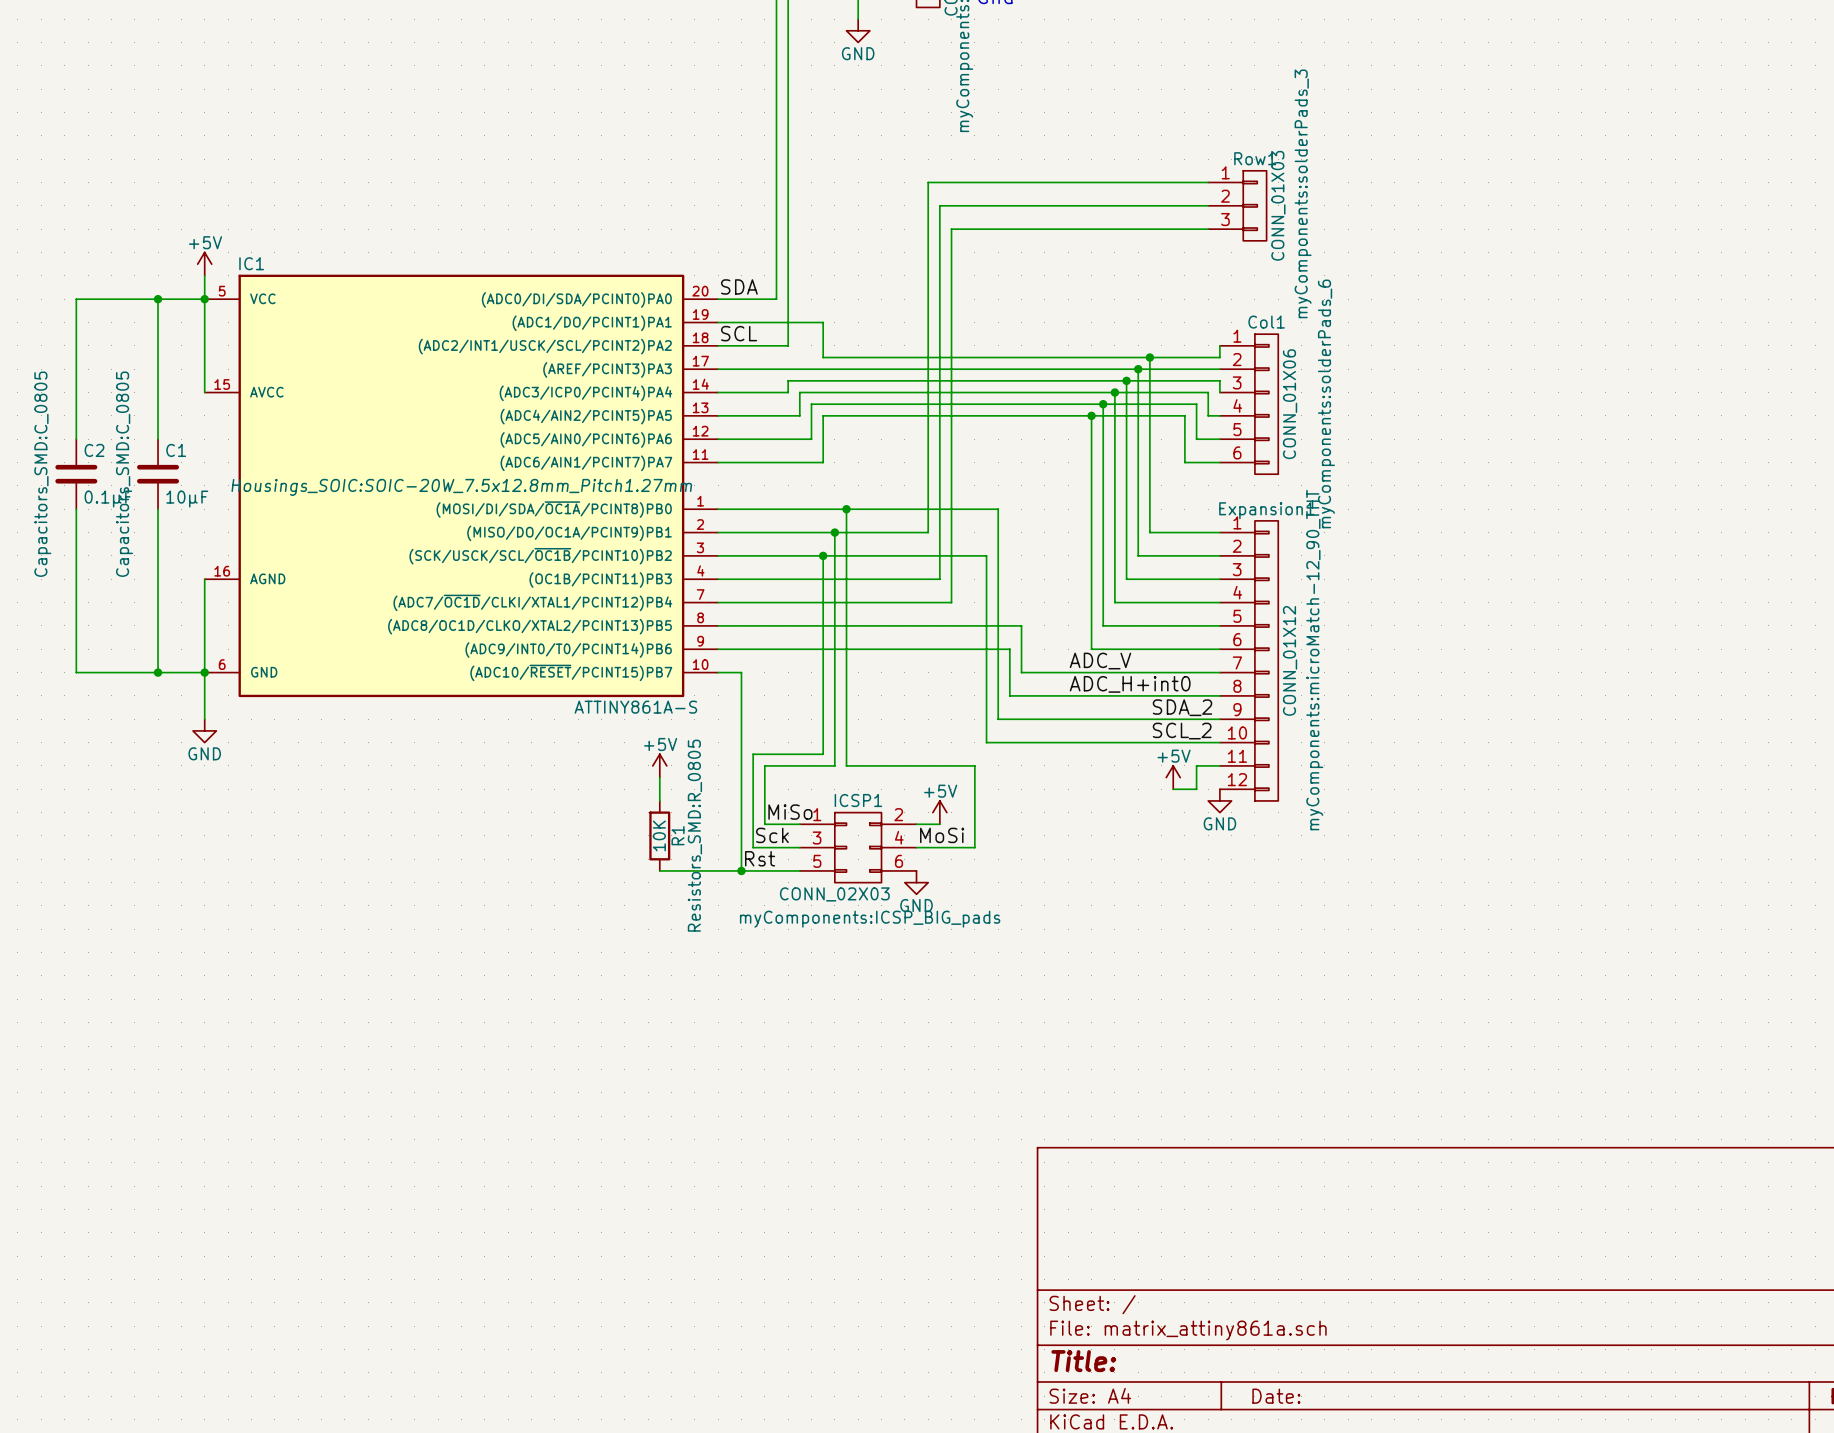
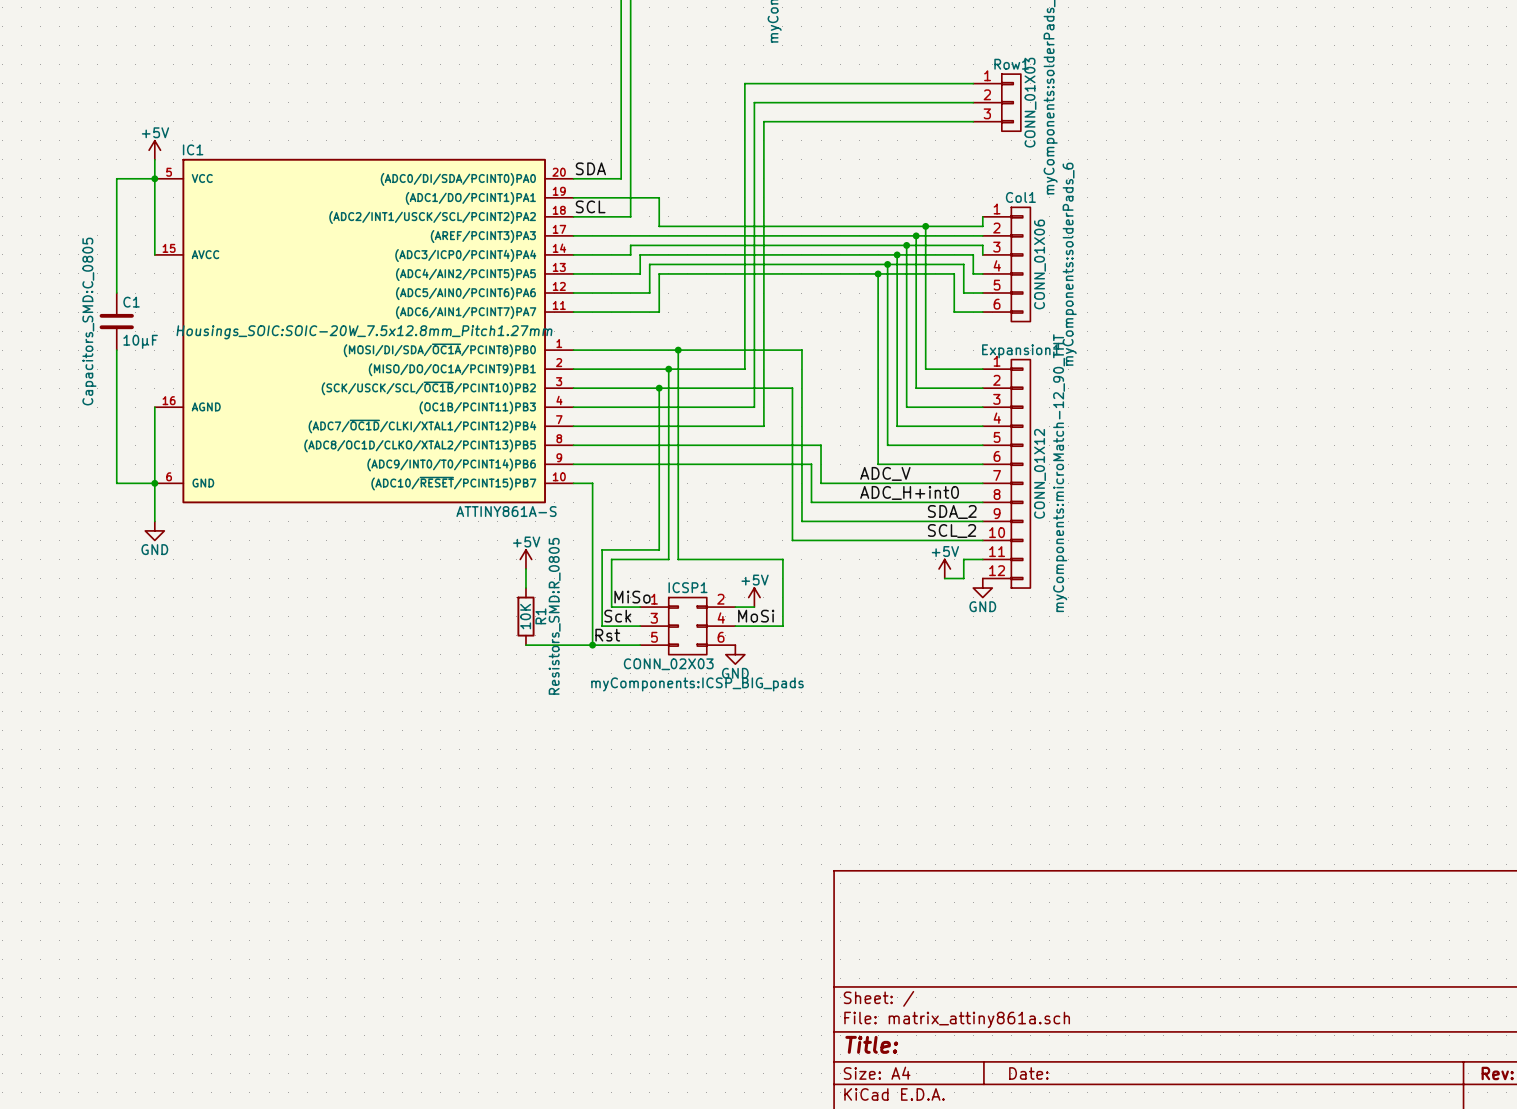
wire: (158, 299) (76, 299) (76, 439) -> none
junction: (158, 299) -> none
C2: 0.1µF (76, 474) -> none
wire: (76, 509) (76, 672) (158, 672) -> none
junction: (158, 672) -> none

